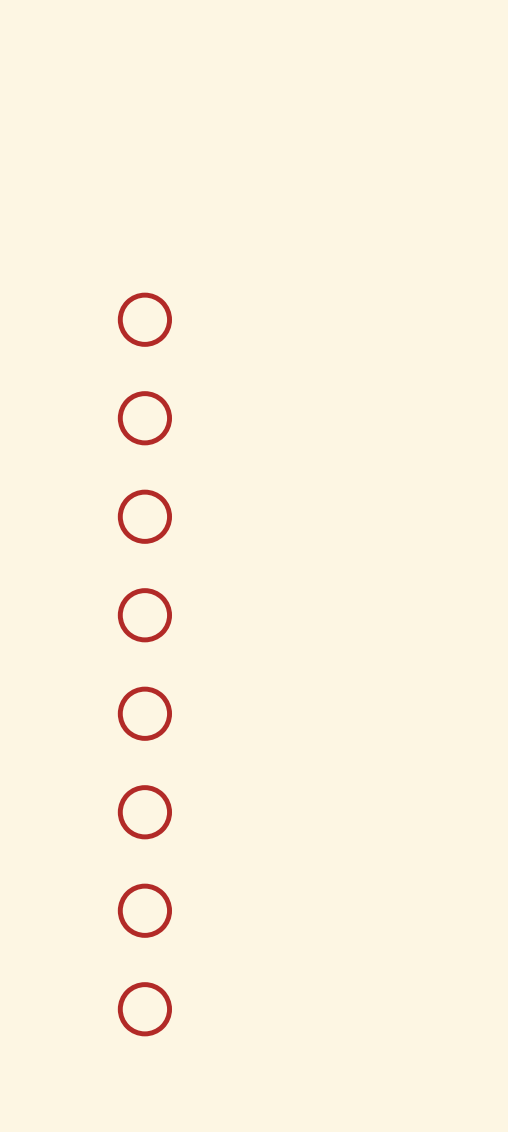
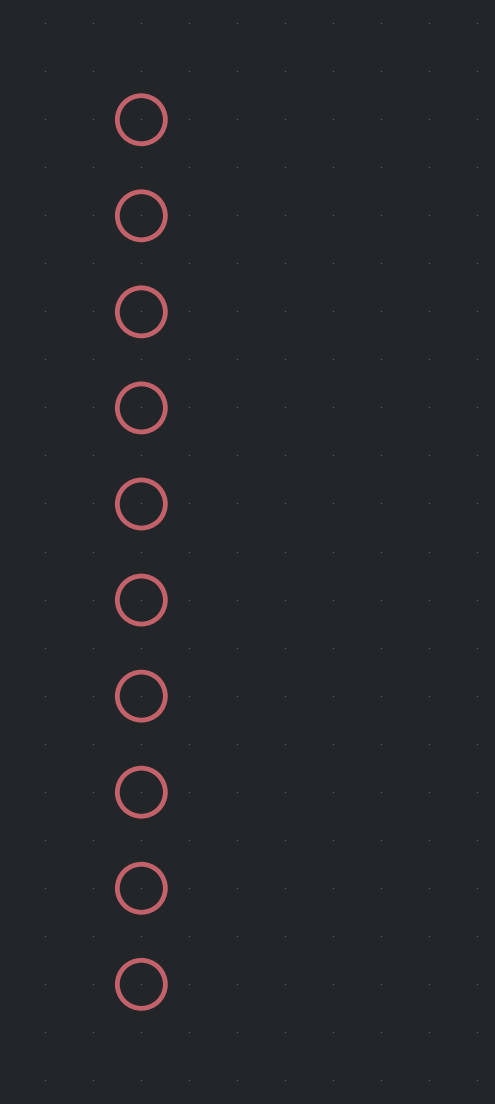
part: none -> (141, 119)
part: none -> (141, 215)

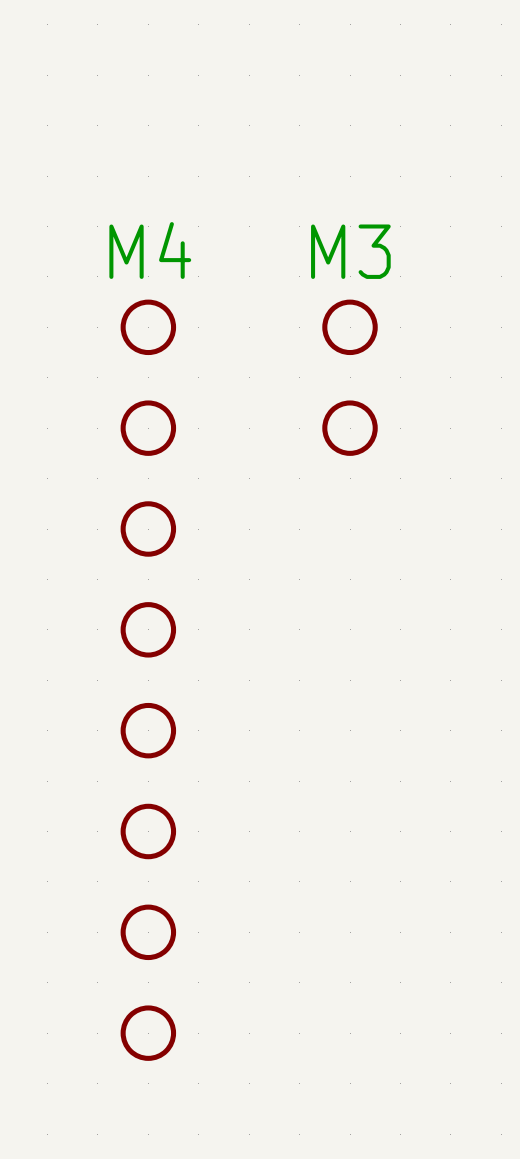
part: (141, 119) -> none
part: (141, 215) -> none
text: none -> M4 (150, 250)
text: none -> M3 (350, 251)
part: none -> (350, 327)
part: none -> (350, 428)

